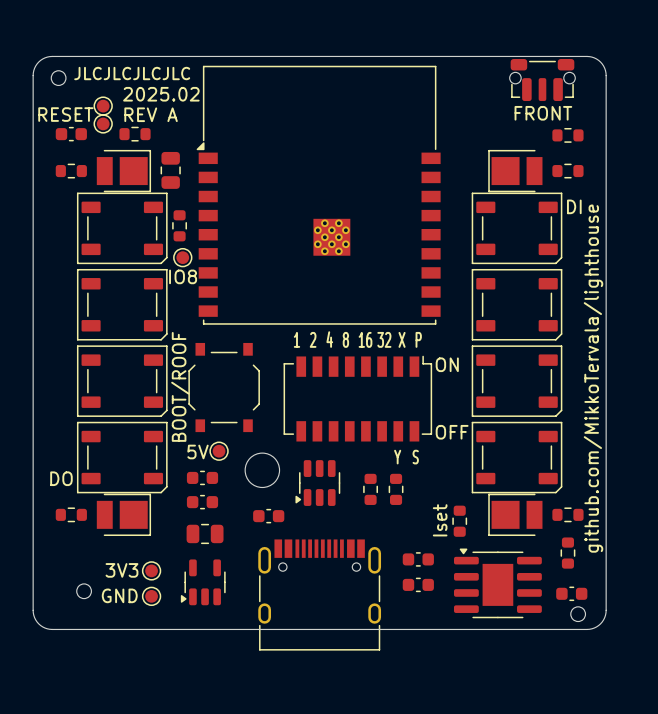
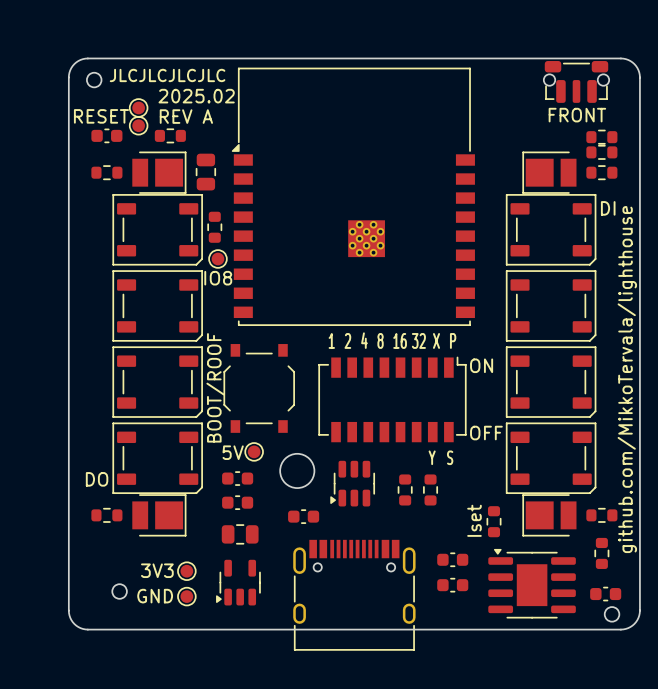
part: none -> (601, 152)

